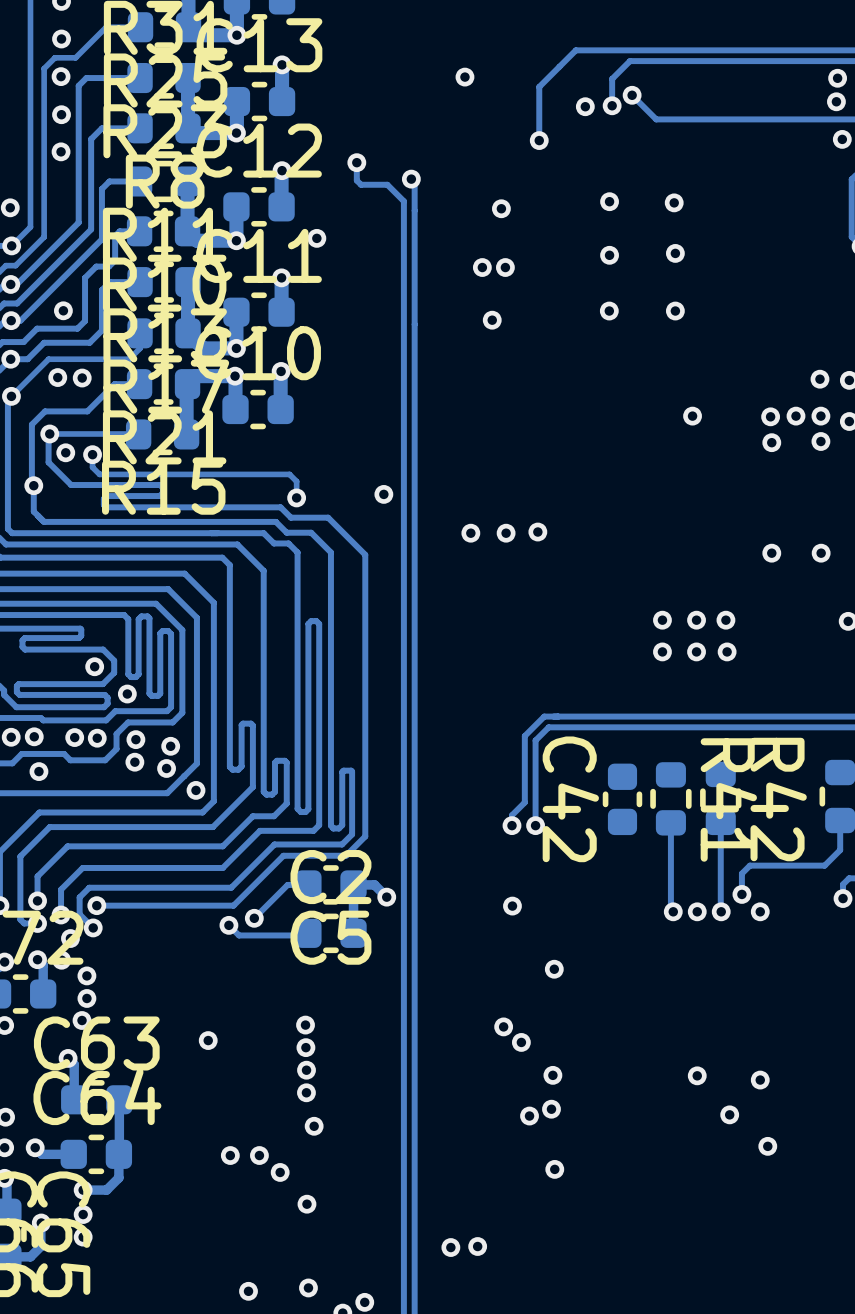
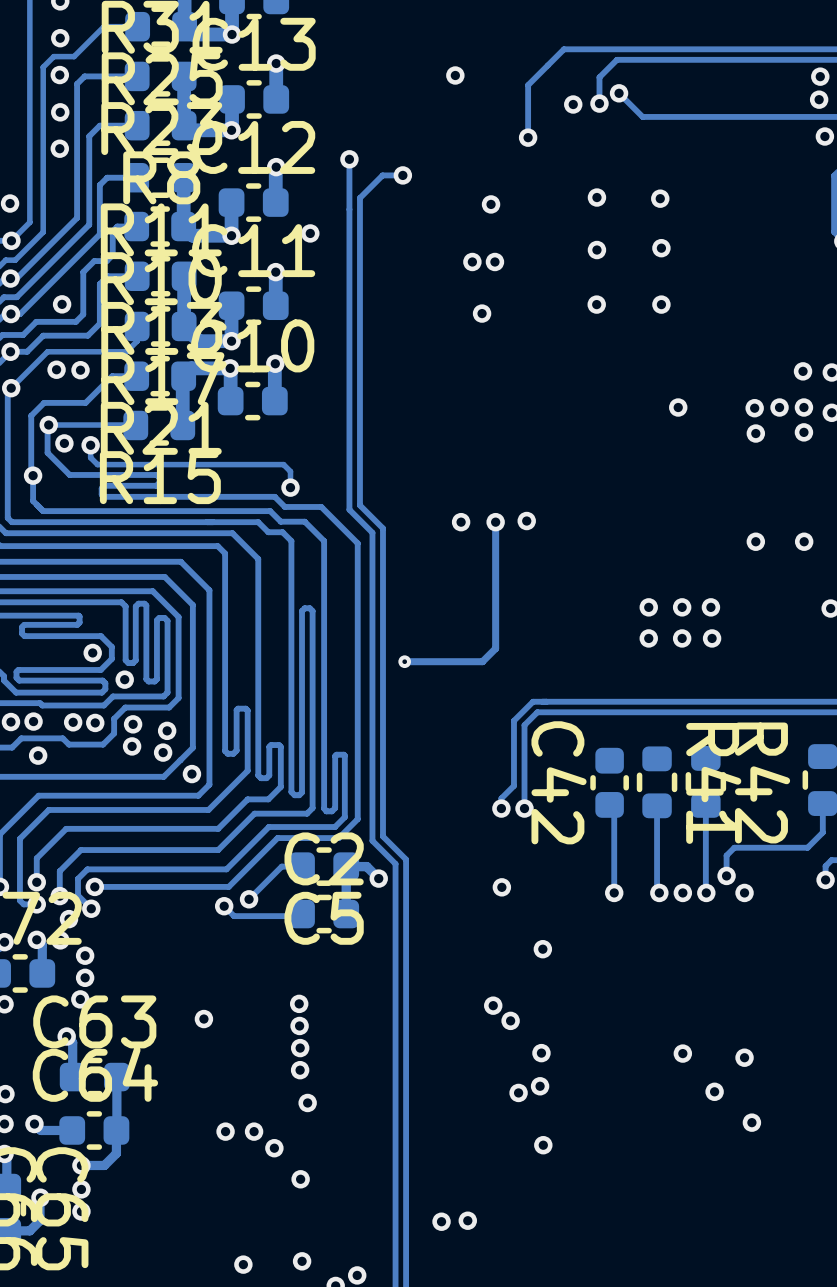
track: (411, 179) (414, 182) (414, 877) -> (402, 175) (382, 175) (359, 198) (359, 505) (382, 528) (382, 836) (406, 859)
track: (356, 180) (361, 184) (387, 184) (403, 201) (403, 882) -> (349, 176) (349, 509) (372, 532) (372, 840) (395, 863)
via: (383, 494) -> none
track: none -> (495, 522) (495, 648) (482, 661) (404, 661)
via: none -> (404, 661)
track: none -> (609, 804) (614, 809) (614, 892)
via: none -> (614, 892)

